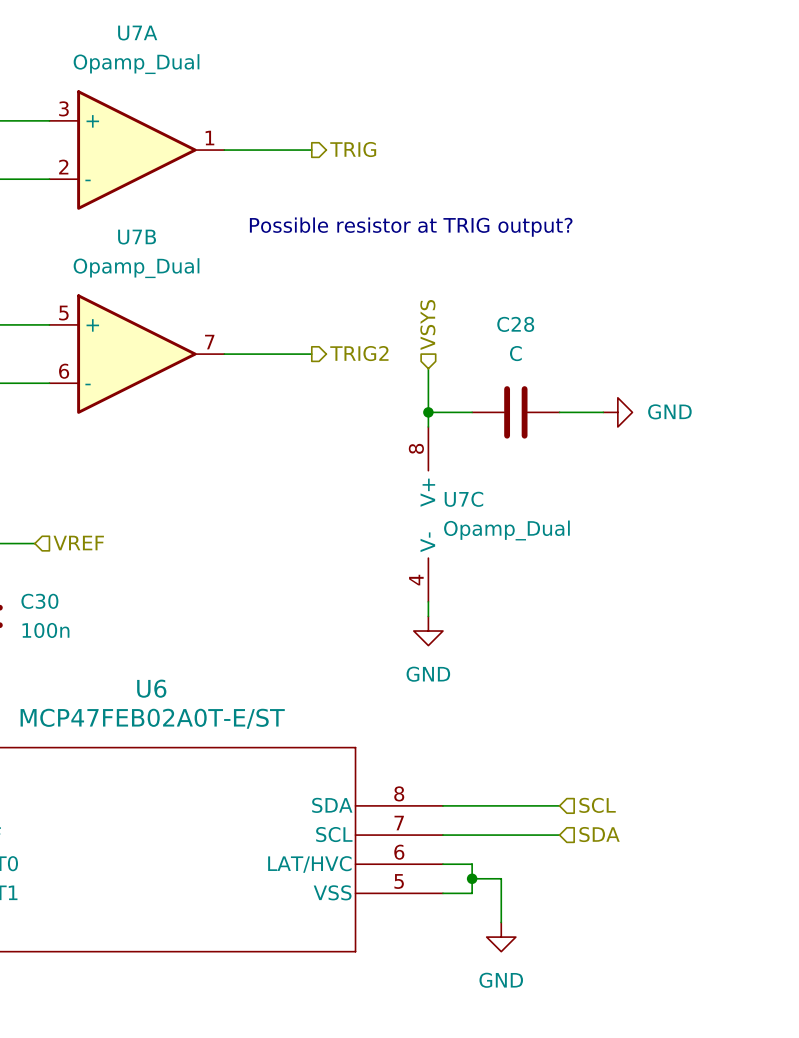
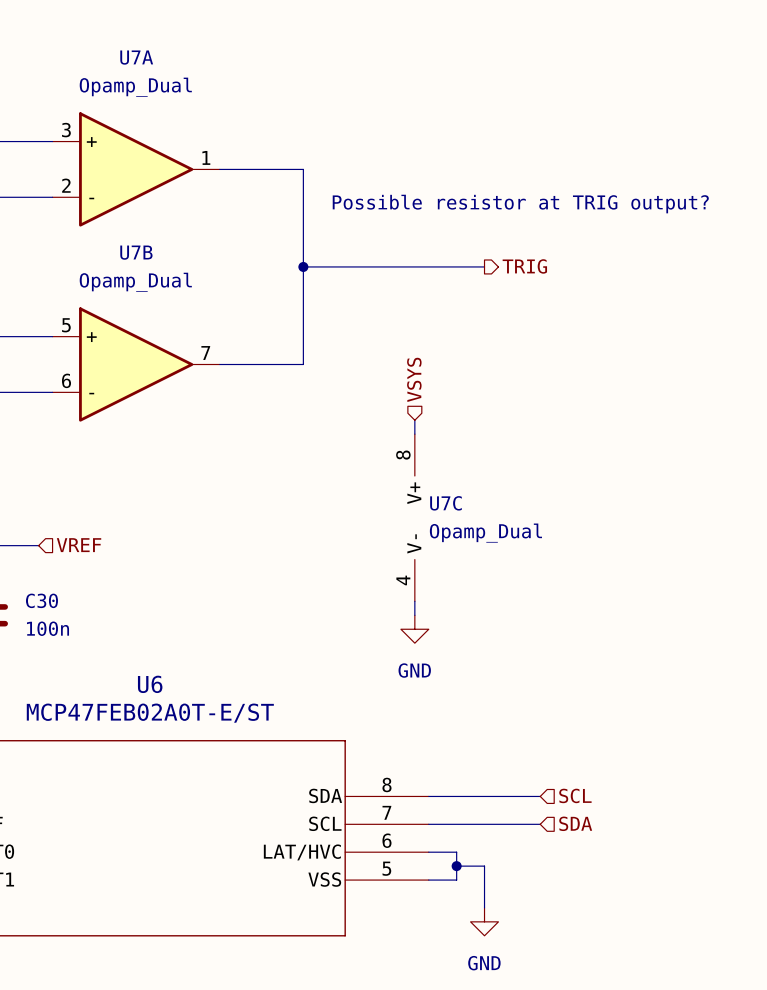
hierarchical label position: TRIG (353, 149) -> TRIG (524, 266)
wire: none -> (303, 169) (303, 364)
text position: Possible resistor at TRIG output? (411, 227) -> Possible resistor at TRIG output? (520, 204)
wire: none -> (303, 266) (484, 266)
junction: none -> (303, 266)
hierarchical label position: VSYS (427, 325) -> VSYS (414, 379)
hierarchical label: TRIG2 (359, 353) -> none
wire: (428, 368) (428, 412) (472, 412) -> none
junction: (428, 412) -> none
C28: C (515, 412) -> none
wire: (559, 412) (603, 412) -> none
power symbol: GND (617, 412) -> none

